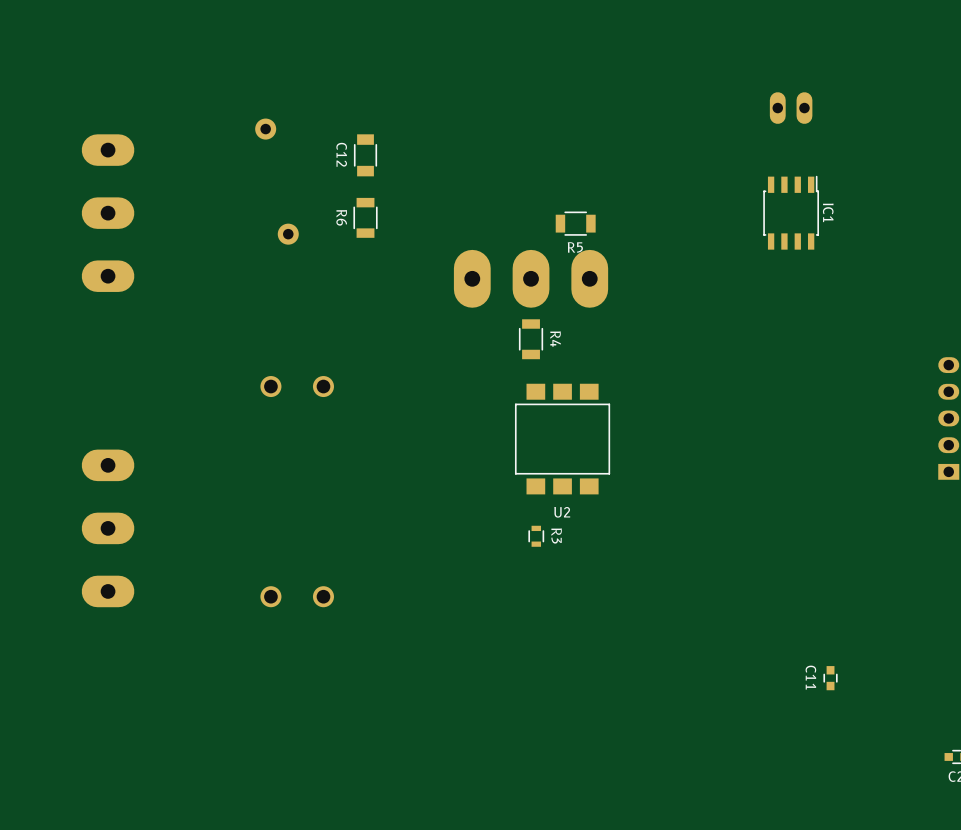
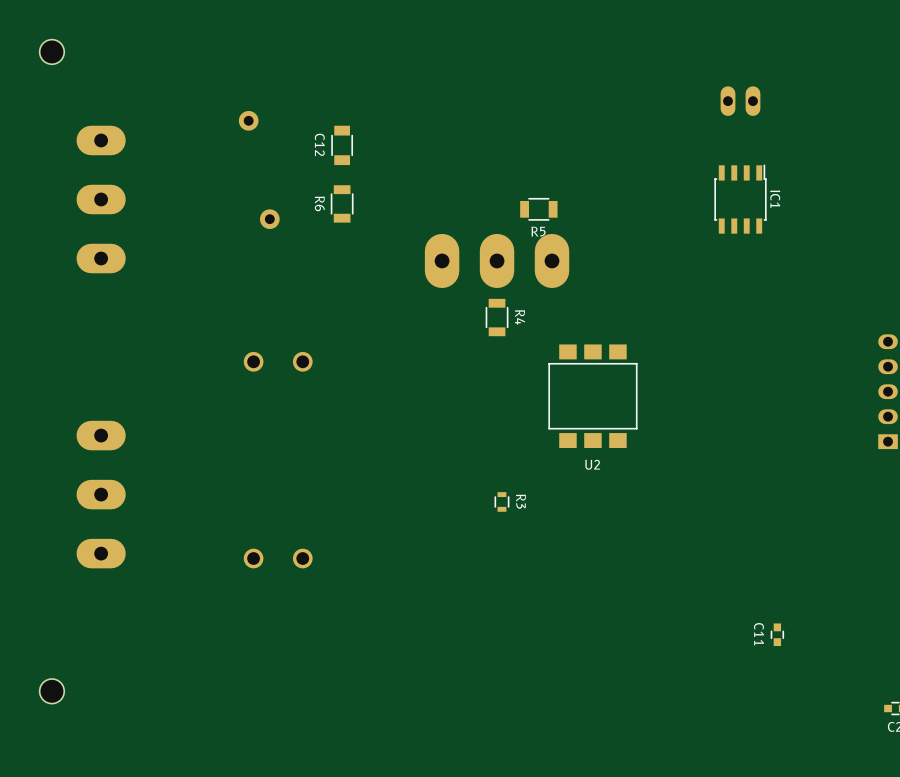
part: none -> (51, 51)
U2 position: (562, 439) -> (592, 396)
part: none -> (51, 691)

